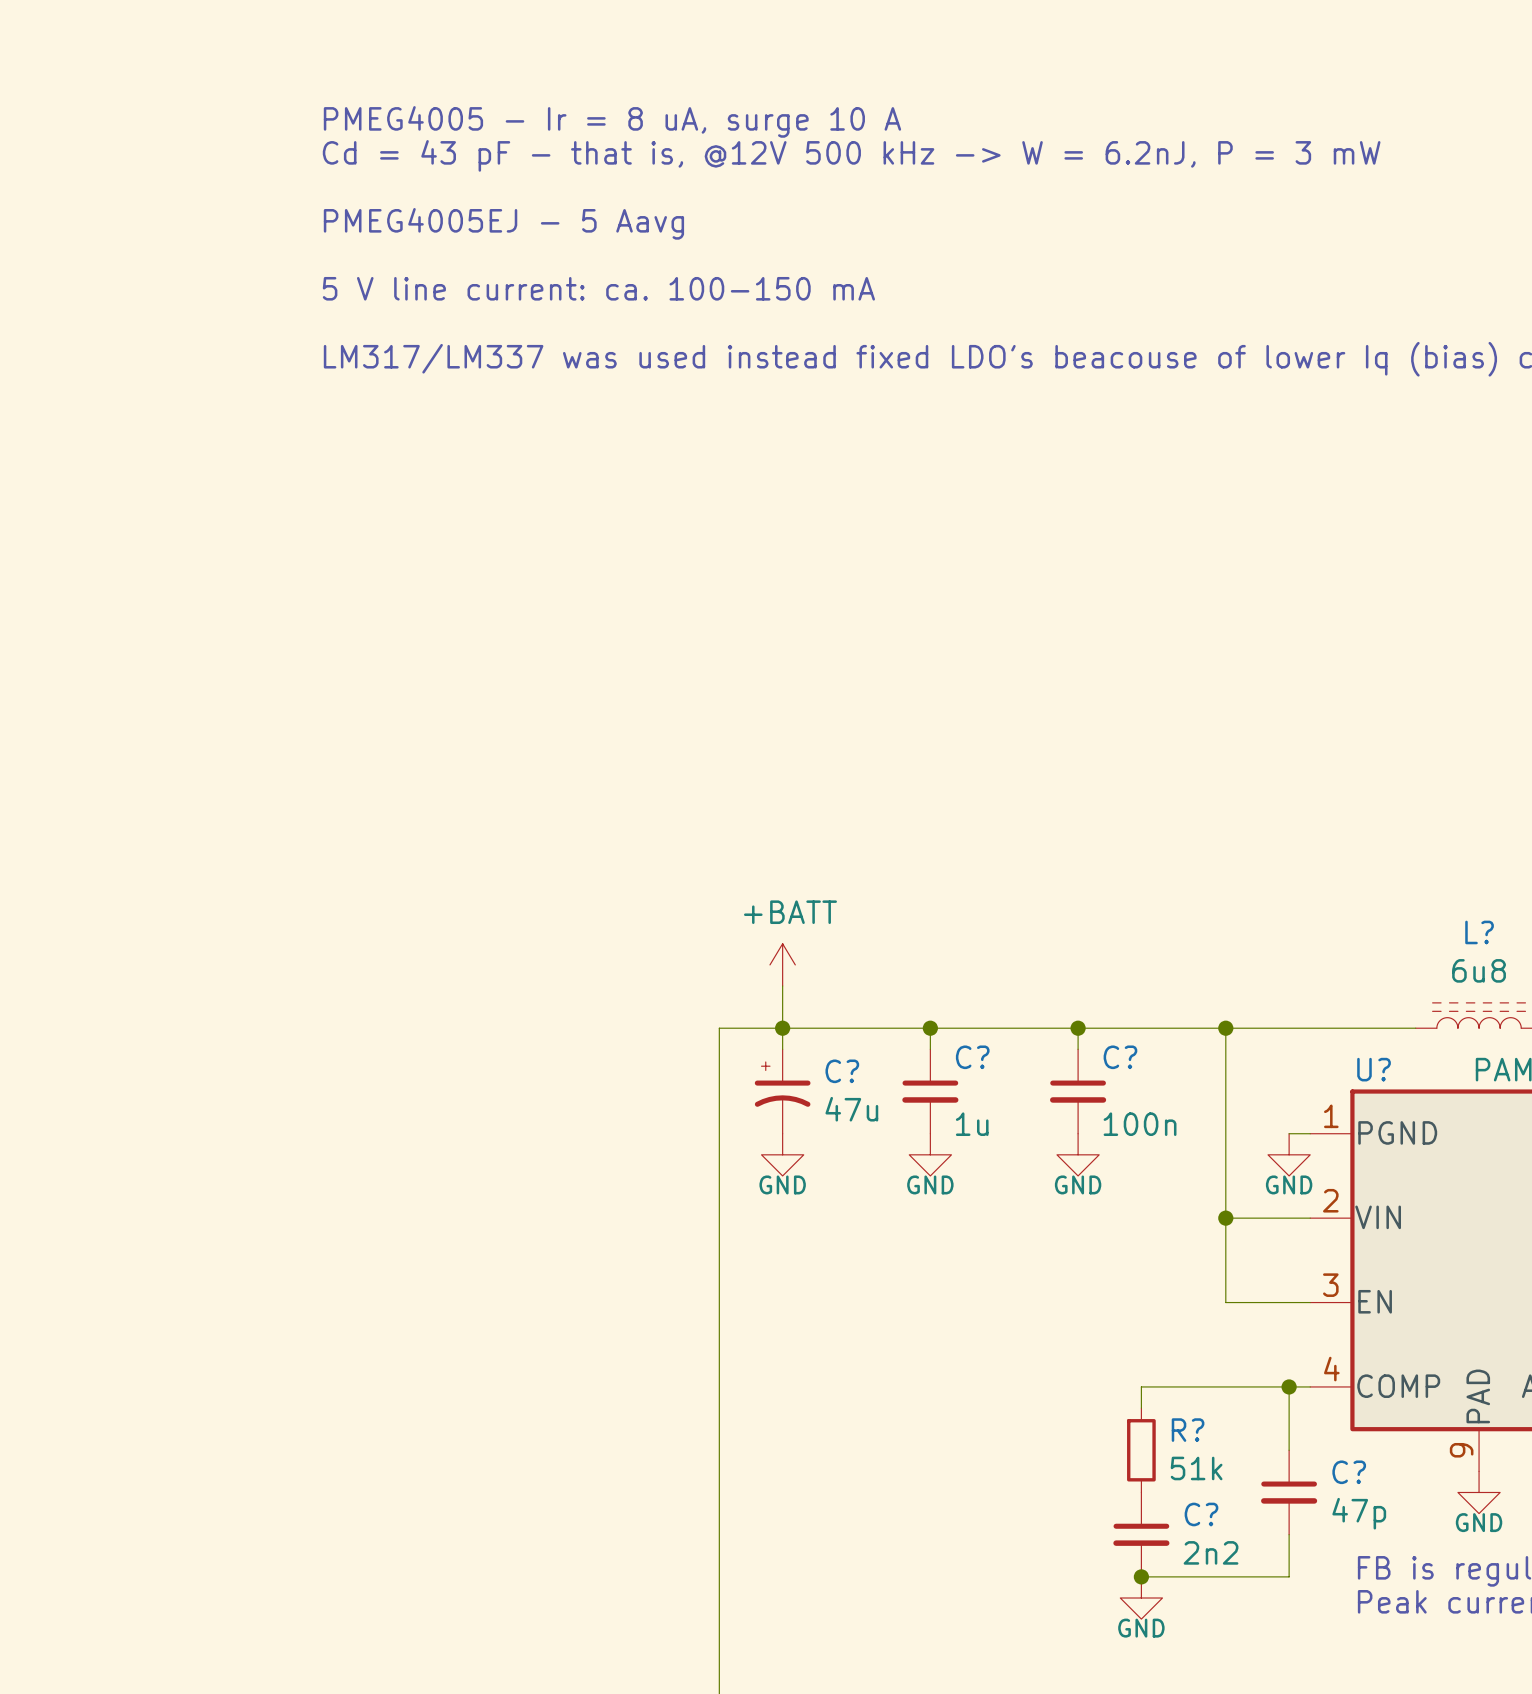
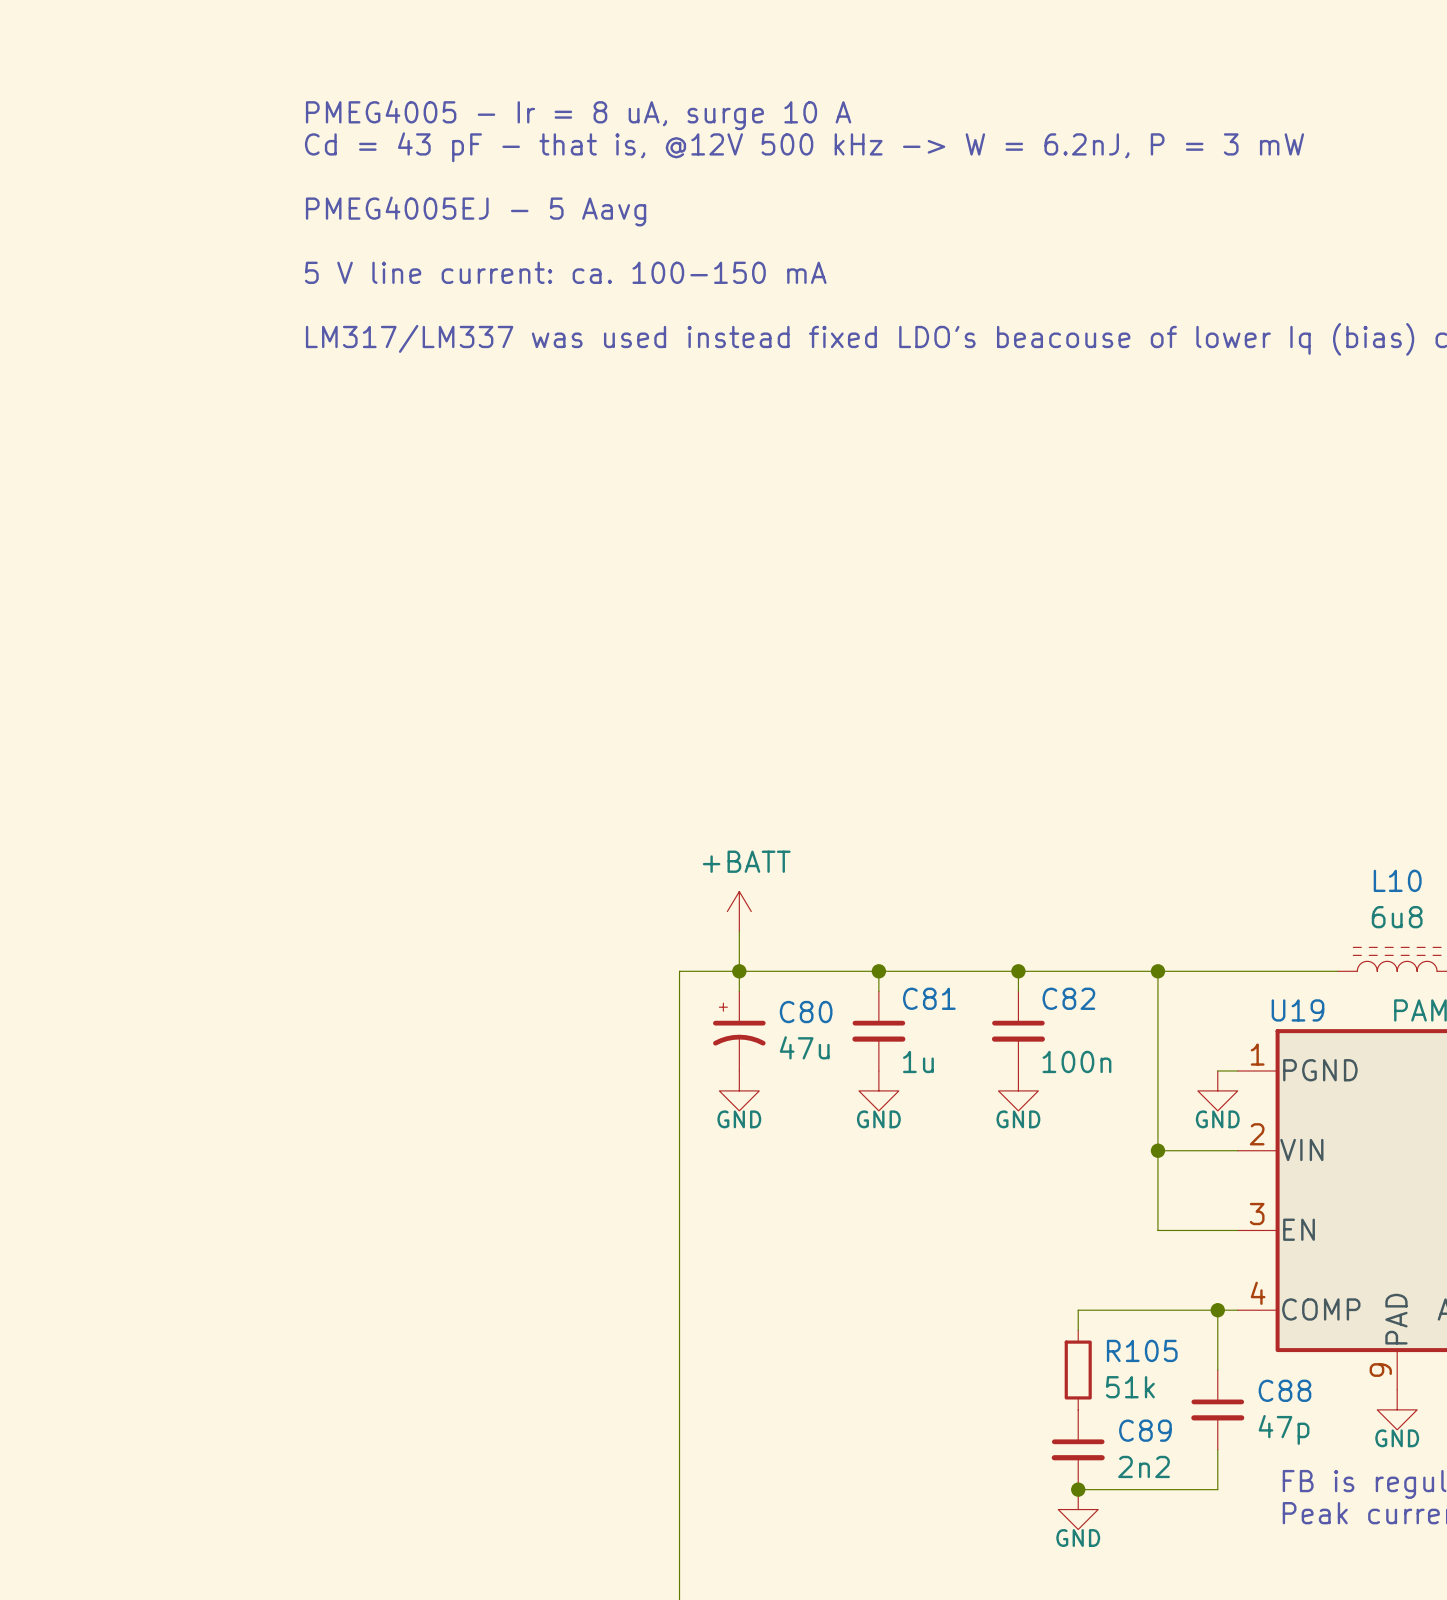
L? name: L? (1479, 932) -> L10 (1397, 880)
C? name: C? (972, 1057) -> C81 (929, 998)
C? name: C? (1120, 1057) -> C82 (1068, 998)
U? name: U? (1374, 1069) -> U19 (1297, 1010)
C? name: C? (842, 1071) -> C80 (806, 1012)
R? name: R? (1188, 1430) -> R105 (1142, 1350)
C? name: C? (1349, 1472) -> C88 (1284, 1390)
C? name: C? (1201, 1514) -> C89 (1145, 1430)

